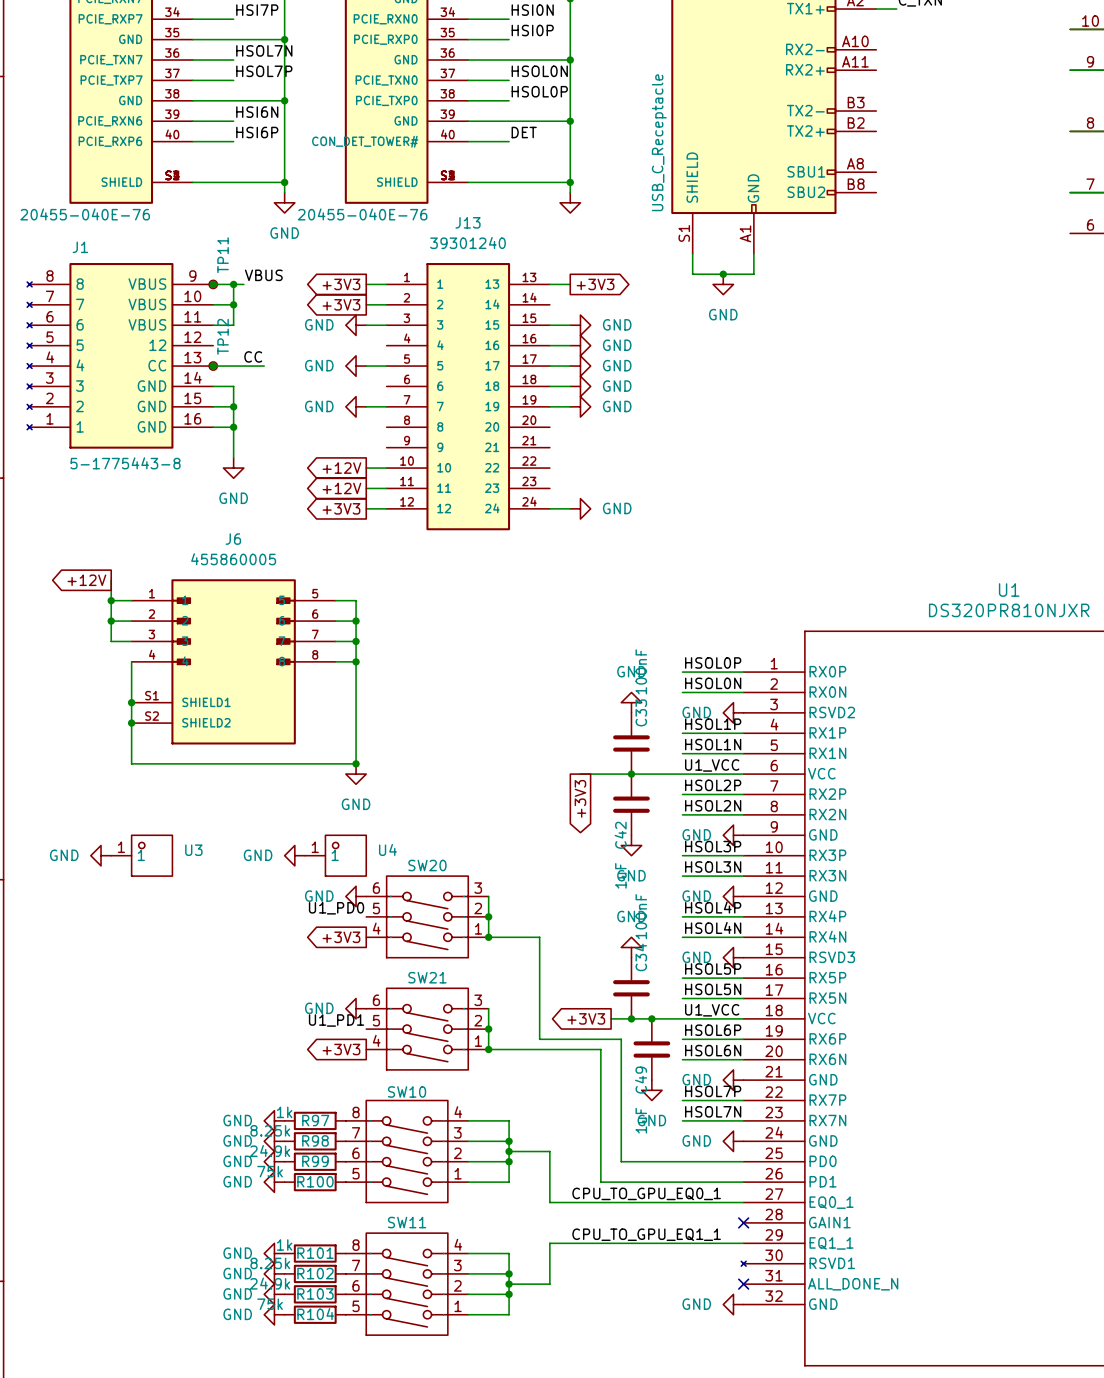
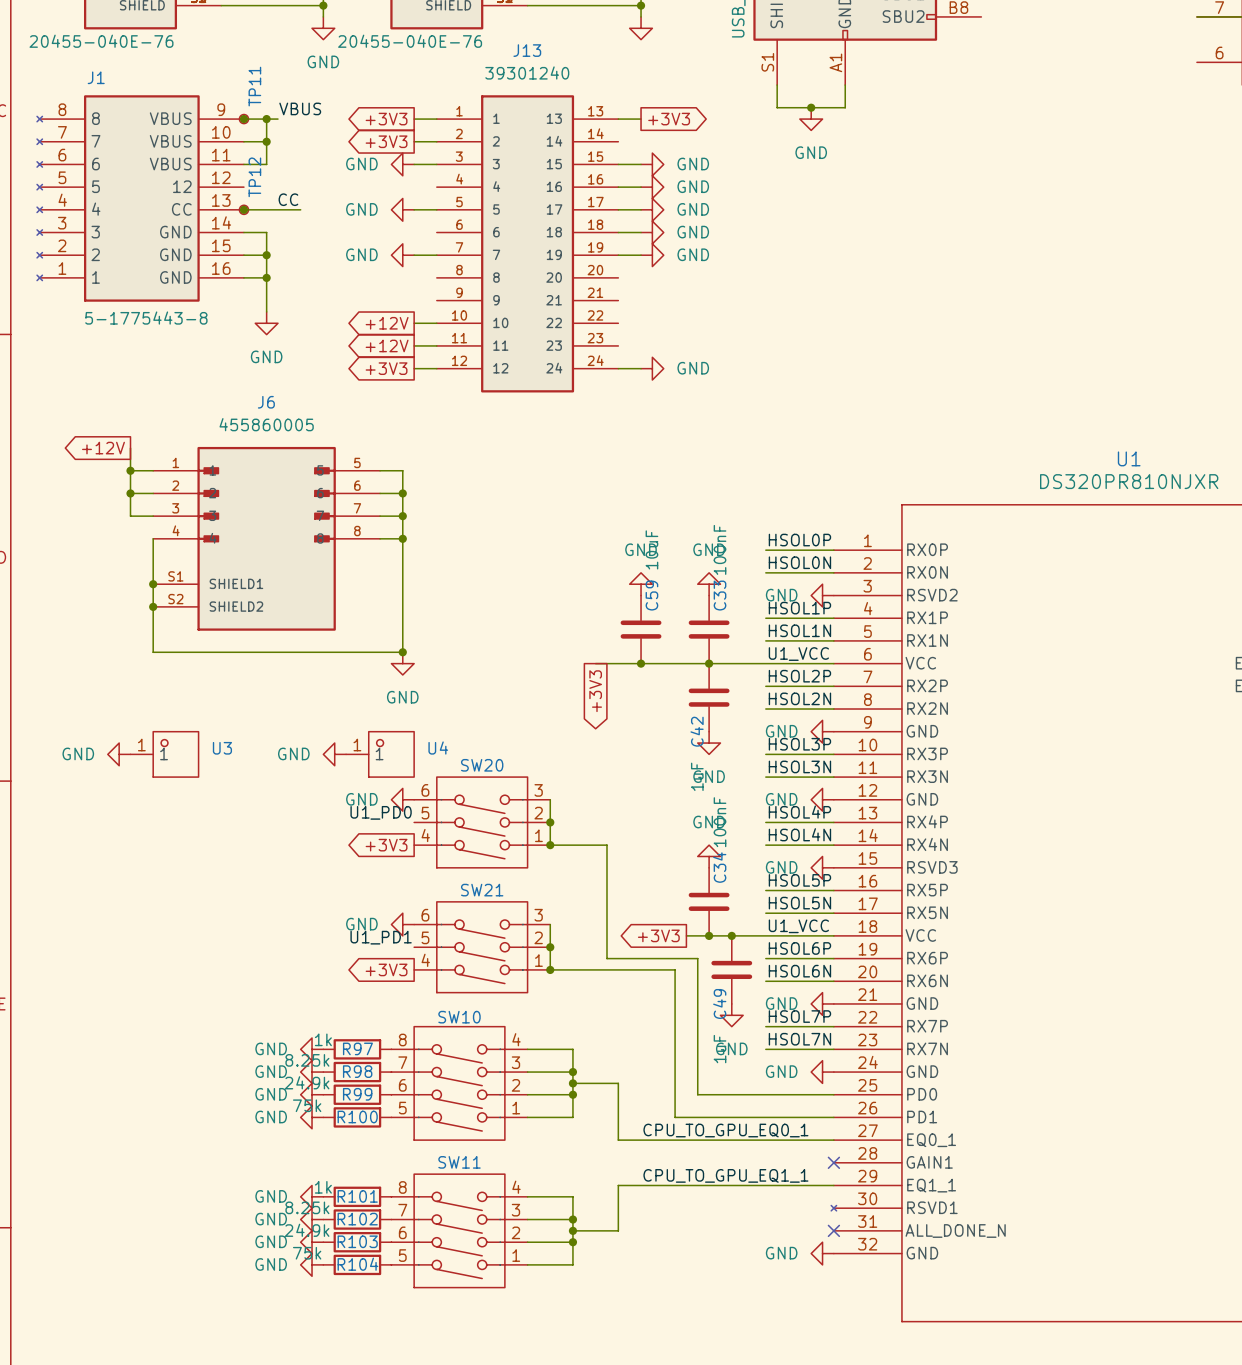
power symbol: none -> GND (641, 584)
C59: none -> 10uF (641, 629)
wire: none -> (595, 663) (652, 663)
junction: none -> (641, 663)
global label position: +3V3 (580, 798) -> +3V3 (595, 691)

